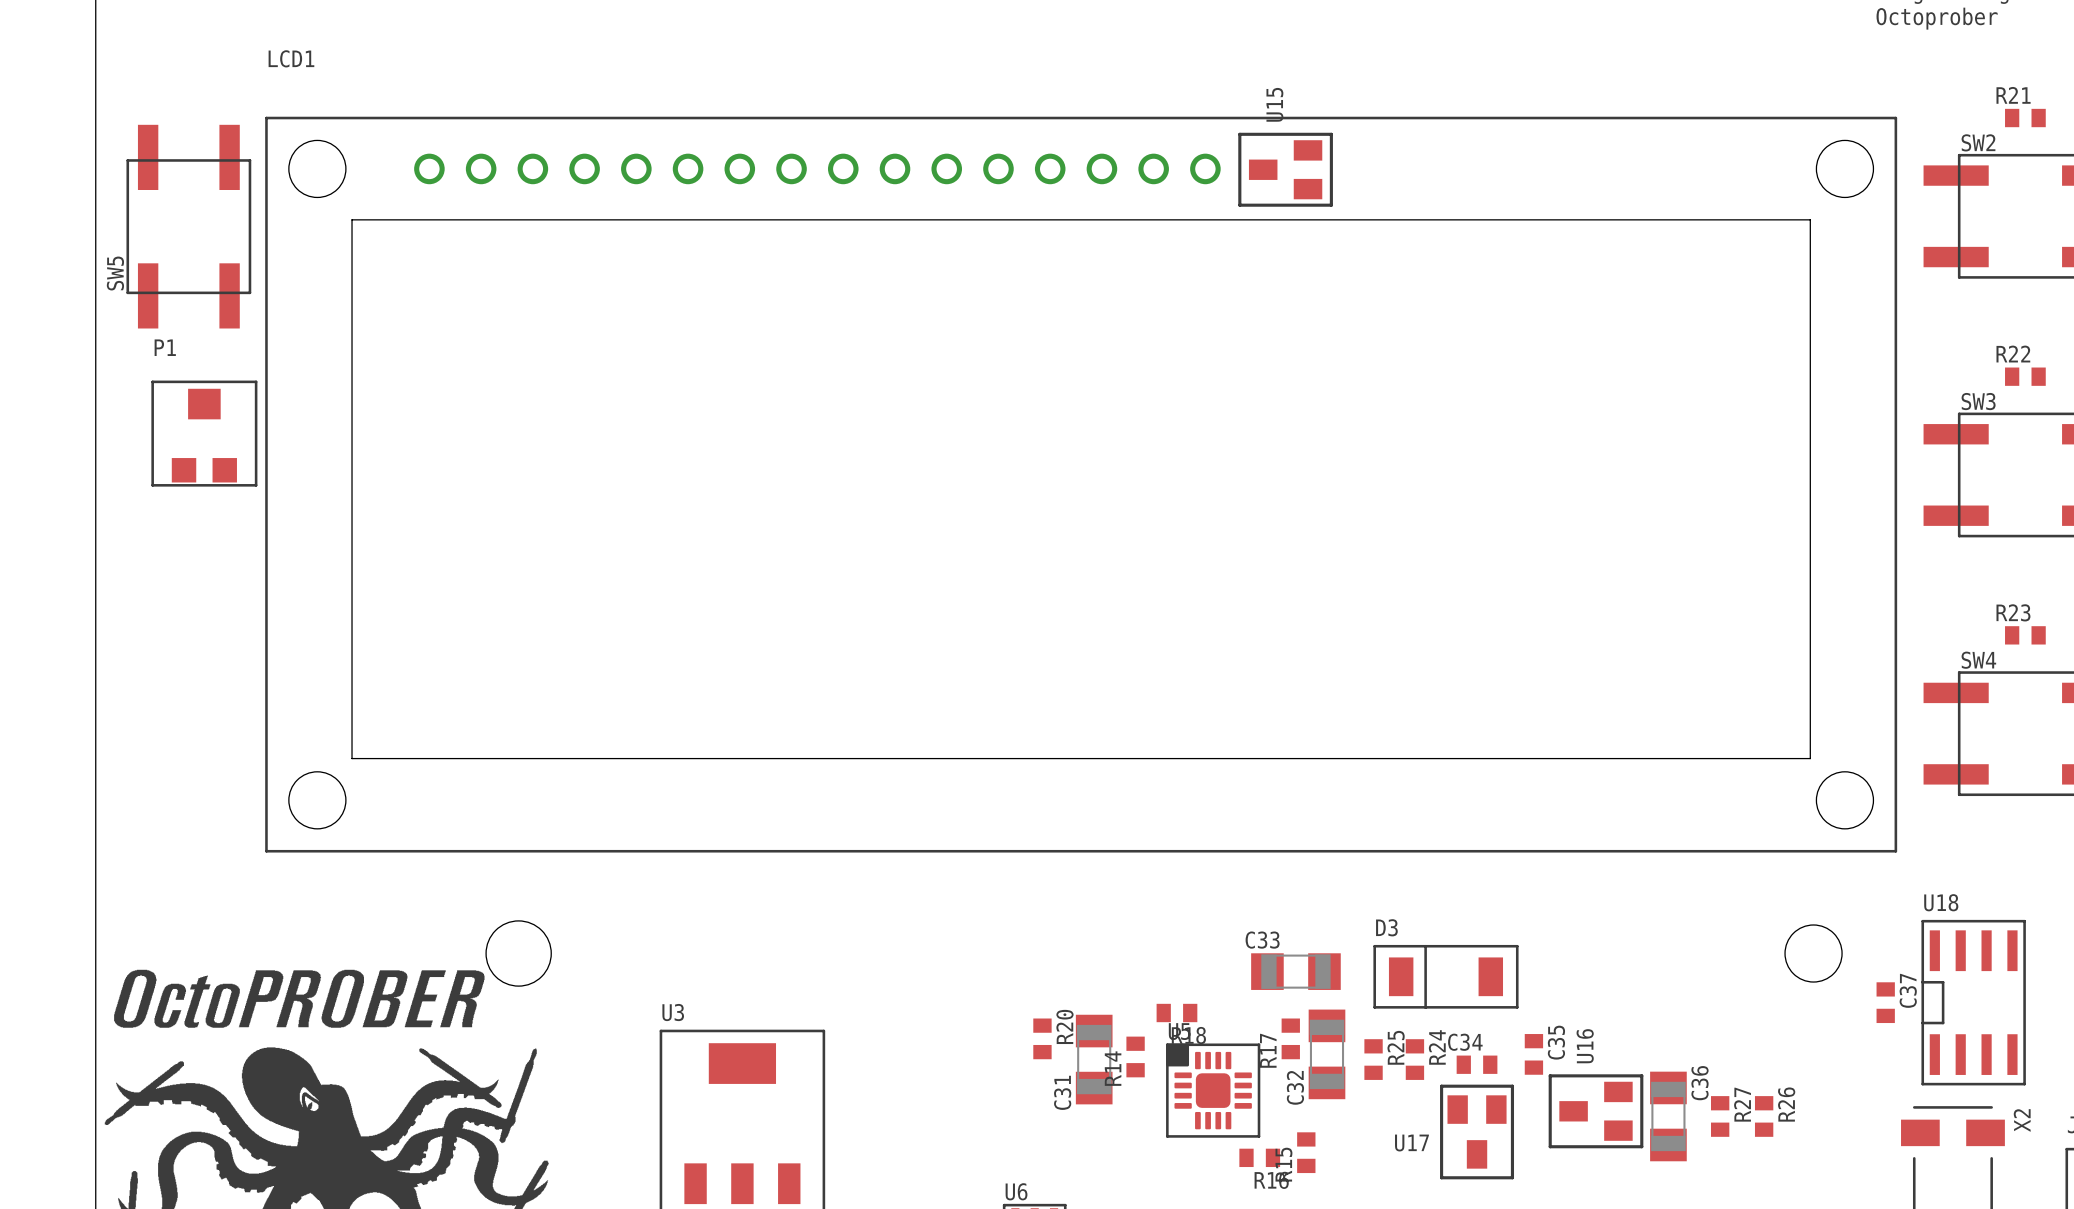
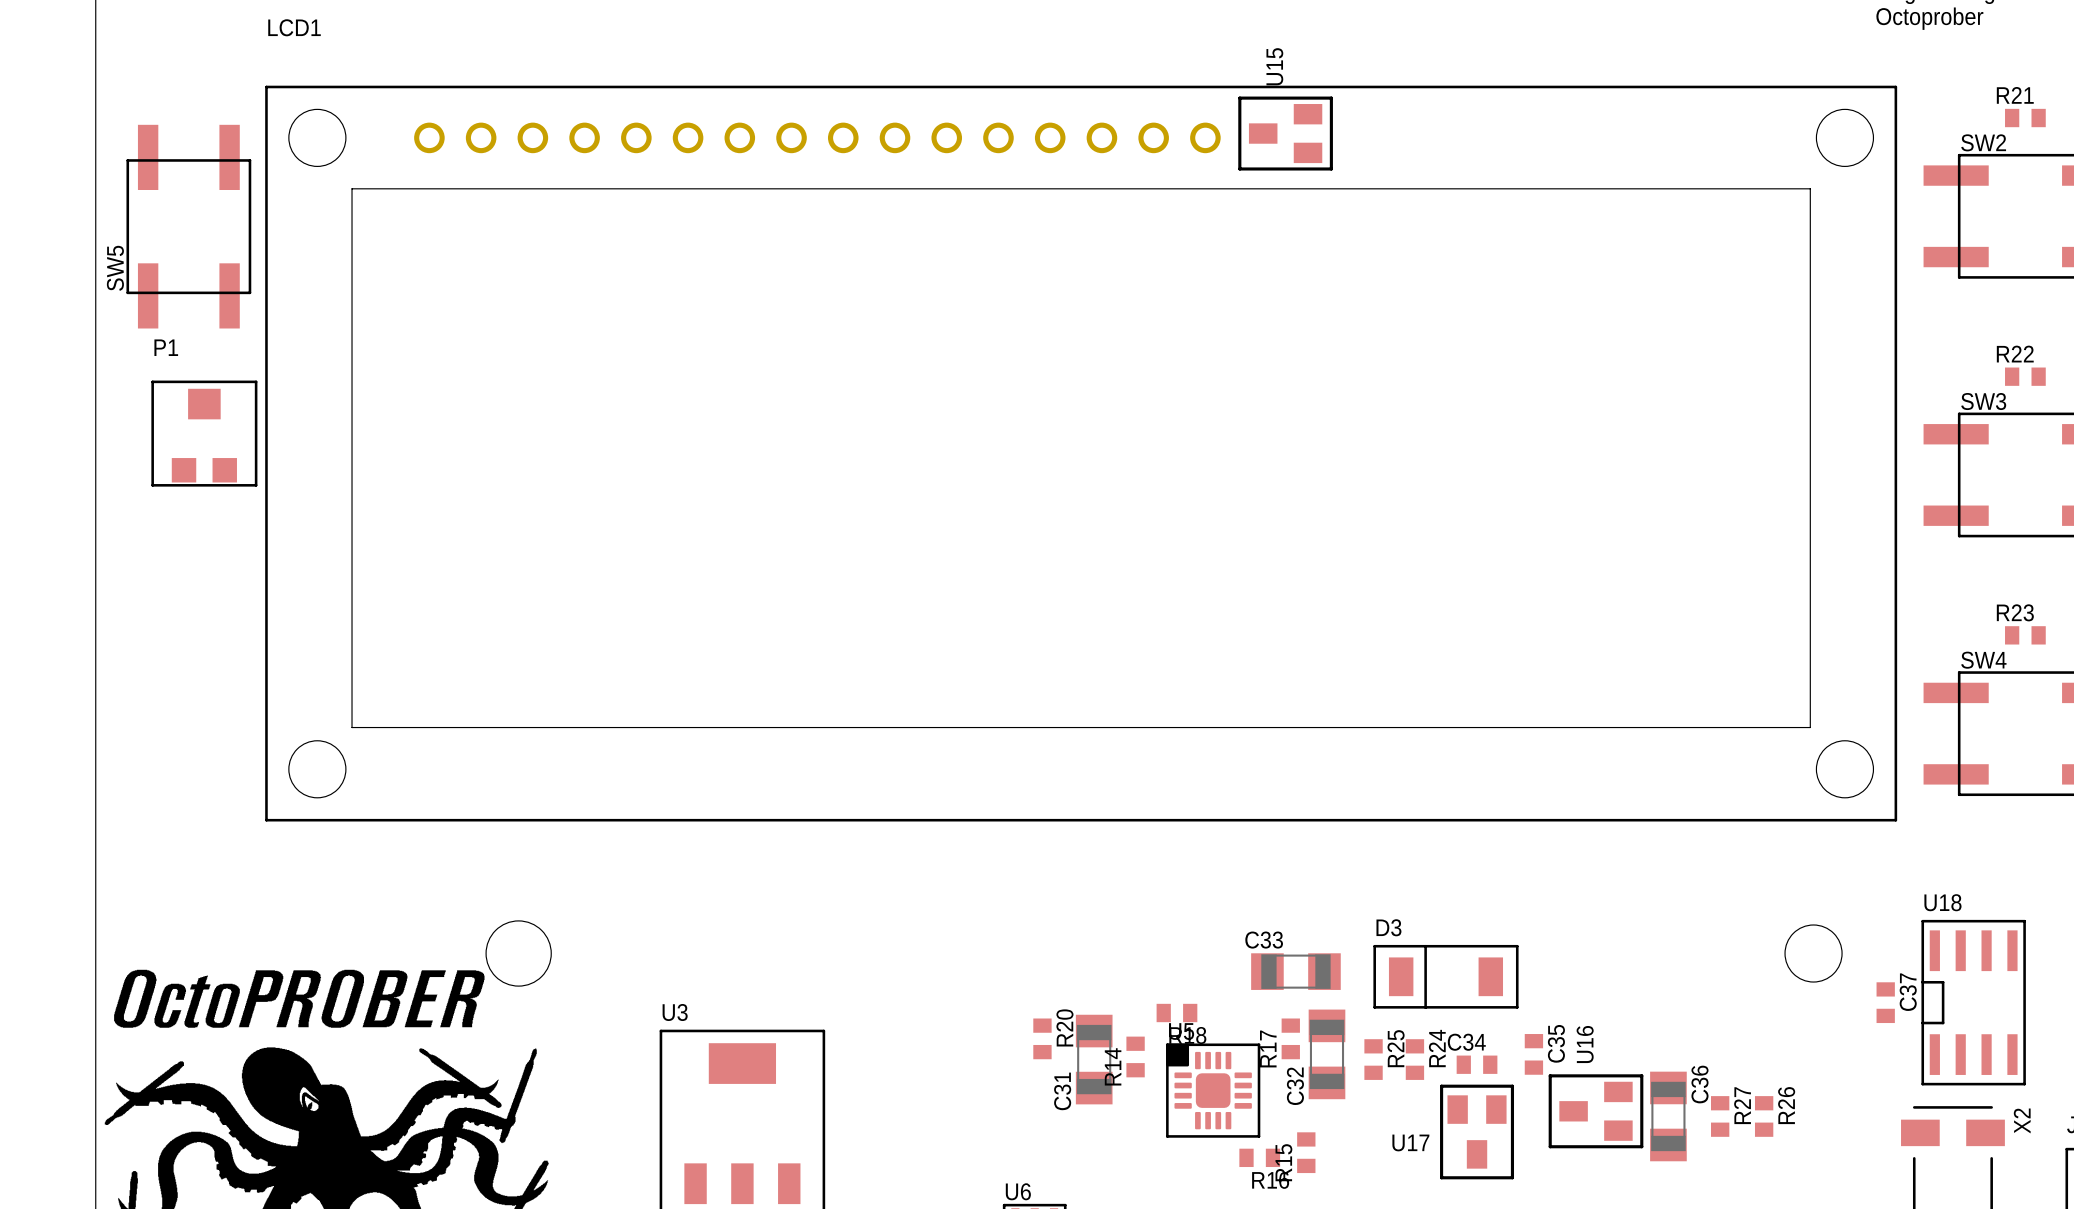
U15 position: (1285, 169) -> (1285, 133)
LCD1 position: (1081, 484) -> (1081, 453)

